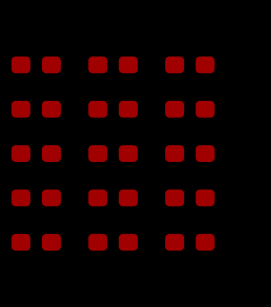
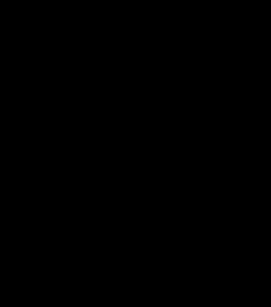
part: (36, 64) -> none
part: (113, 64) -> none
part: (189, 64) -> none
part: (36, 109) -> none
part: (113, 109) -> none
part: (189, 109) -> none
part: (36, 153) -> none
part: (113, 153) -> none
part: (189, 153) -> none
part: (36, 197) -> none
part: (113, 197) -> none
part: (189, 197) -> none
part: (36, 242) -> none
part: (113, 242) -> none
part: (189, 242) -> none

